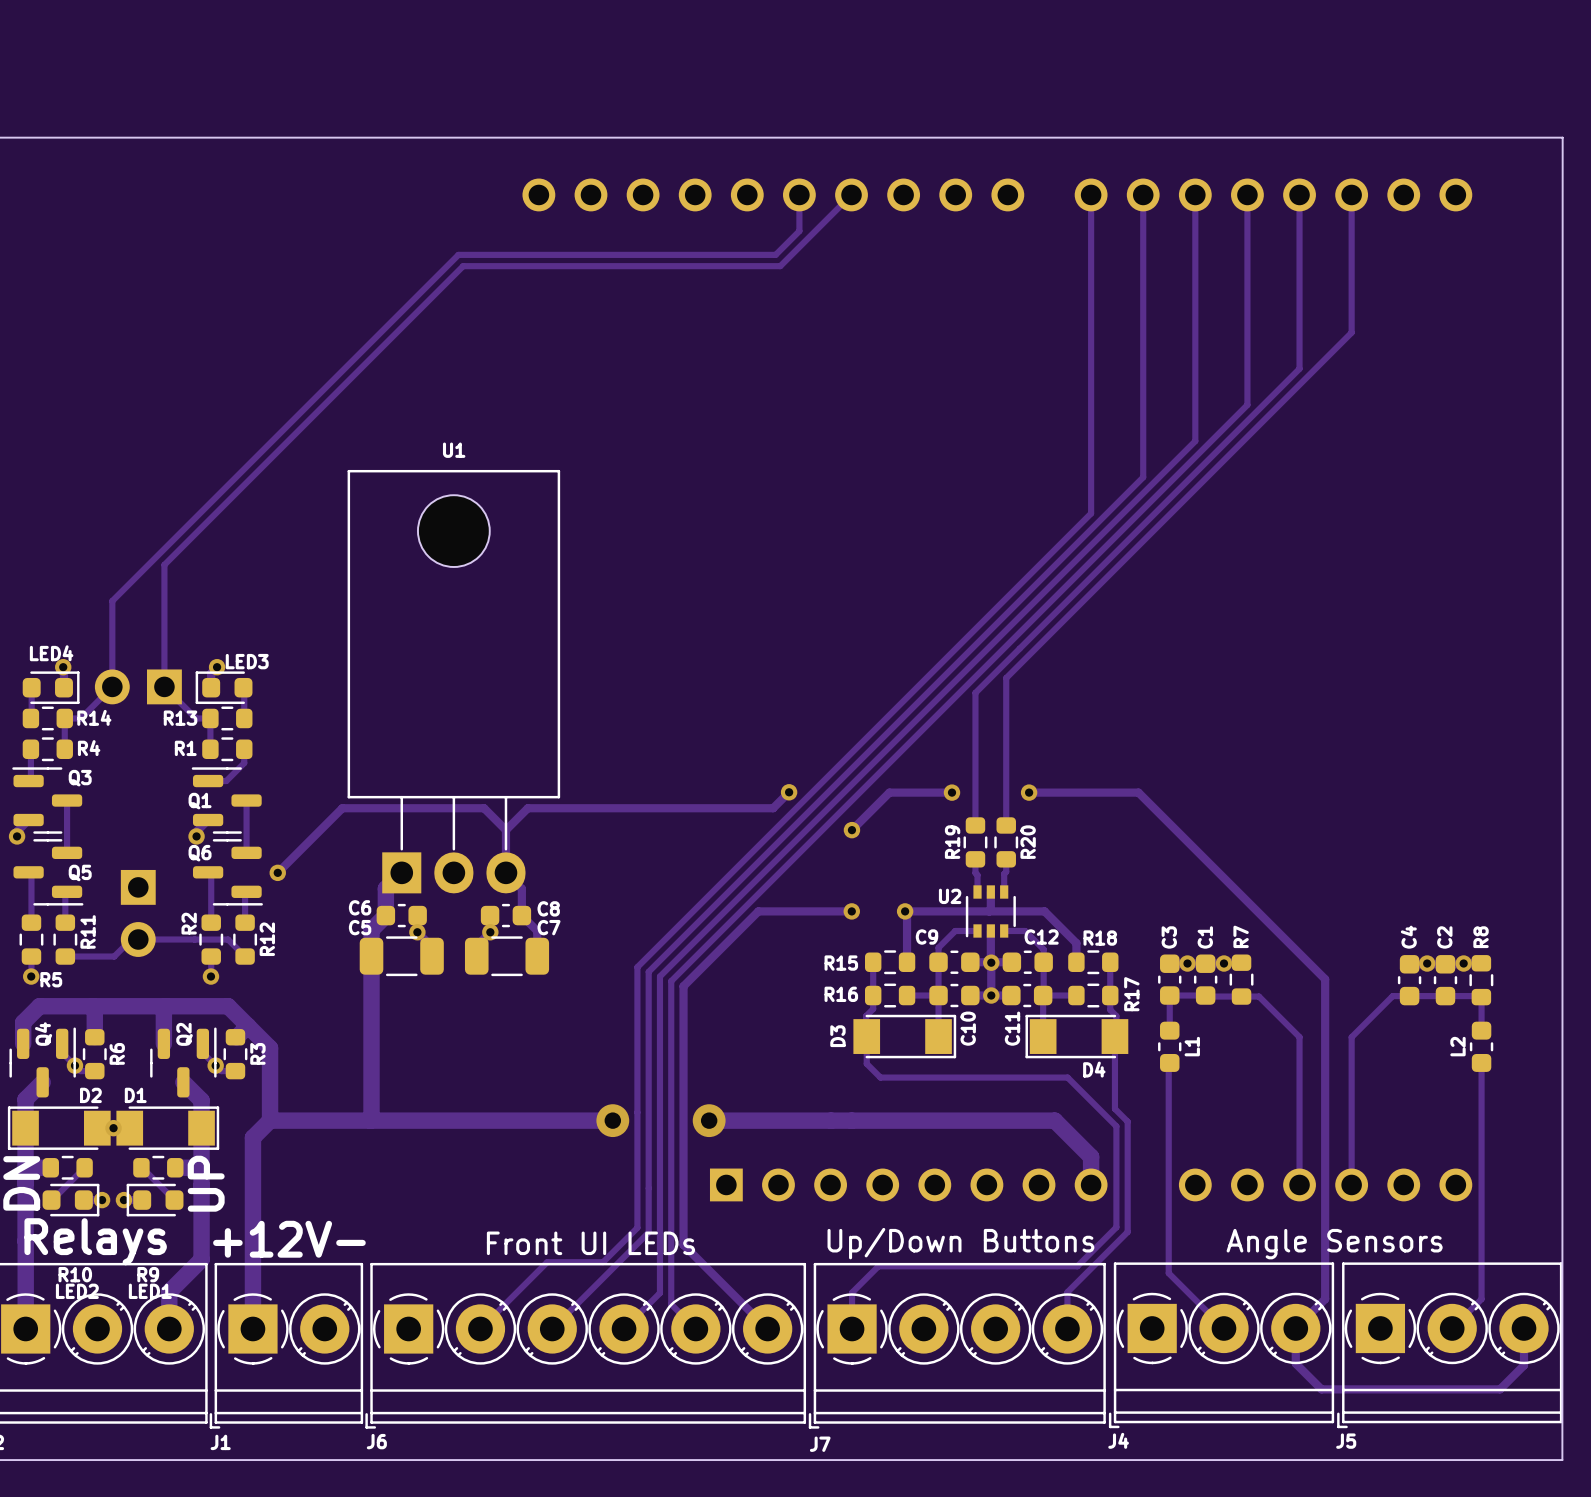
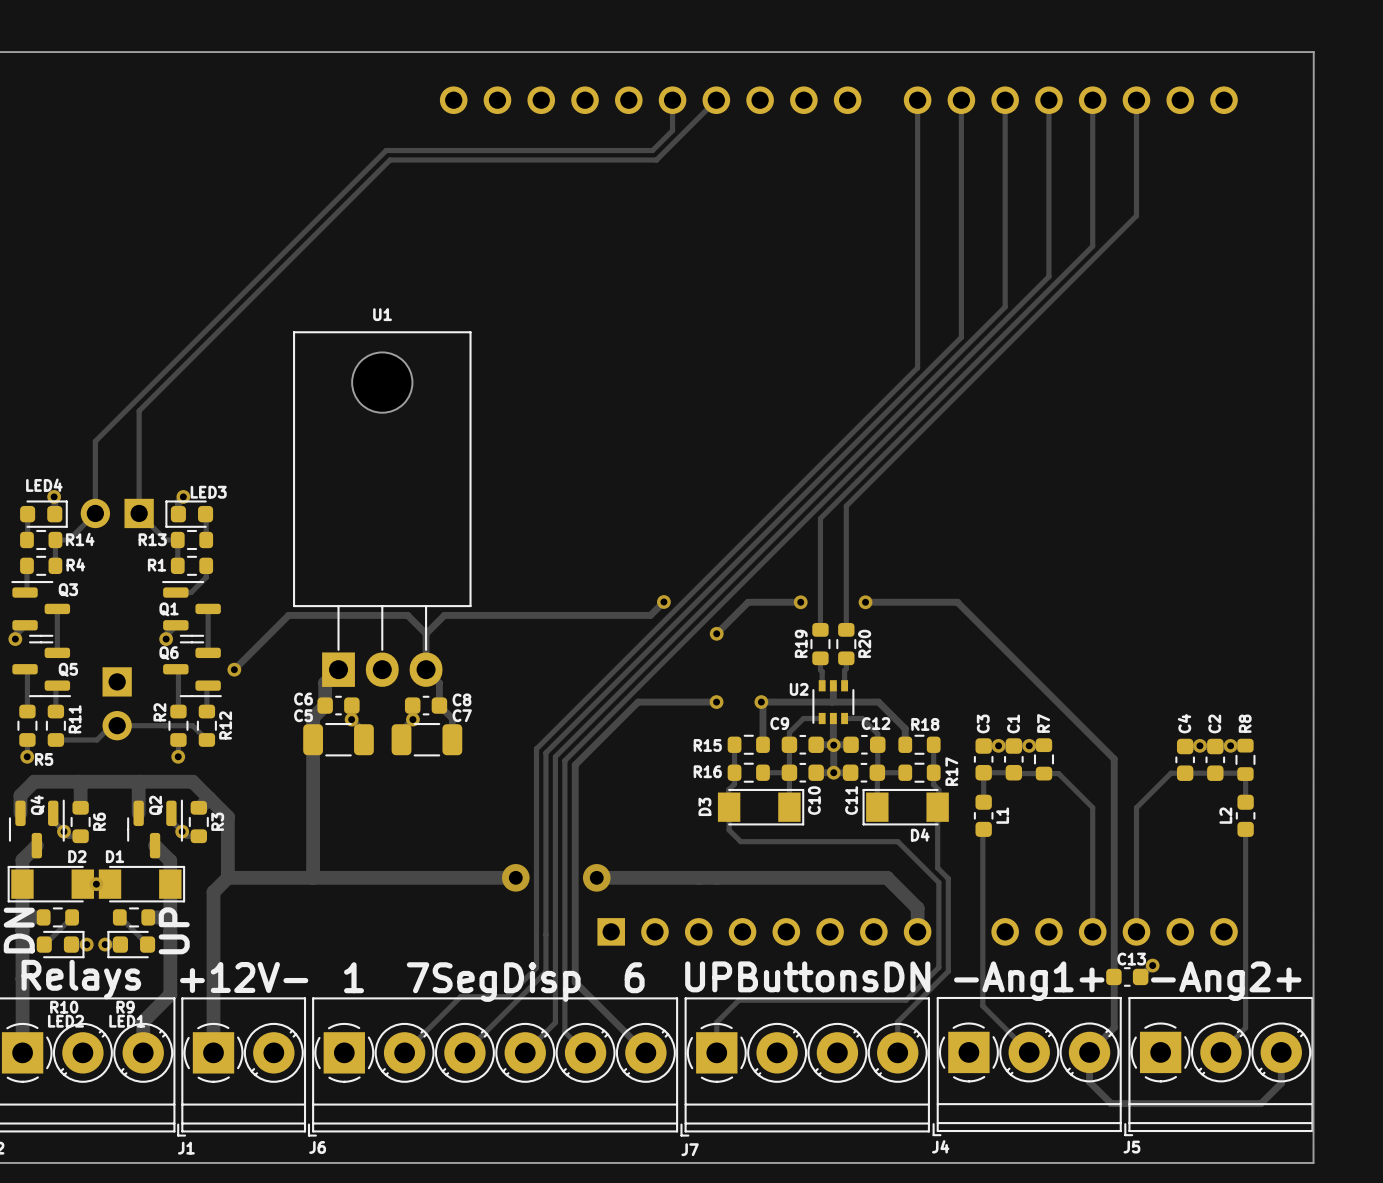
via: none -> (1152, 965)
C13: none -> (1127, 976)
text: Front UI LEDs (590, 1243) -> 1 7SegDisp 6 (494, 982)
text: Up/Down Buttons (960, 1243) -> UPButtonsDN (807, 976)
text: none -> -Ang1+ (1029, 981)
text: none -> -Ang2+ (1226, 981)
text: Angle Sensors (1334, 1244) -> none

